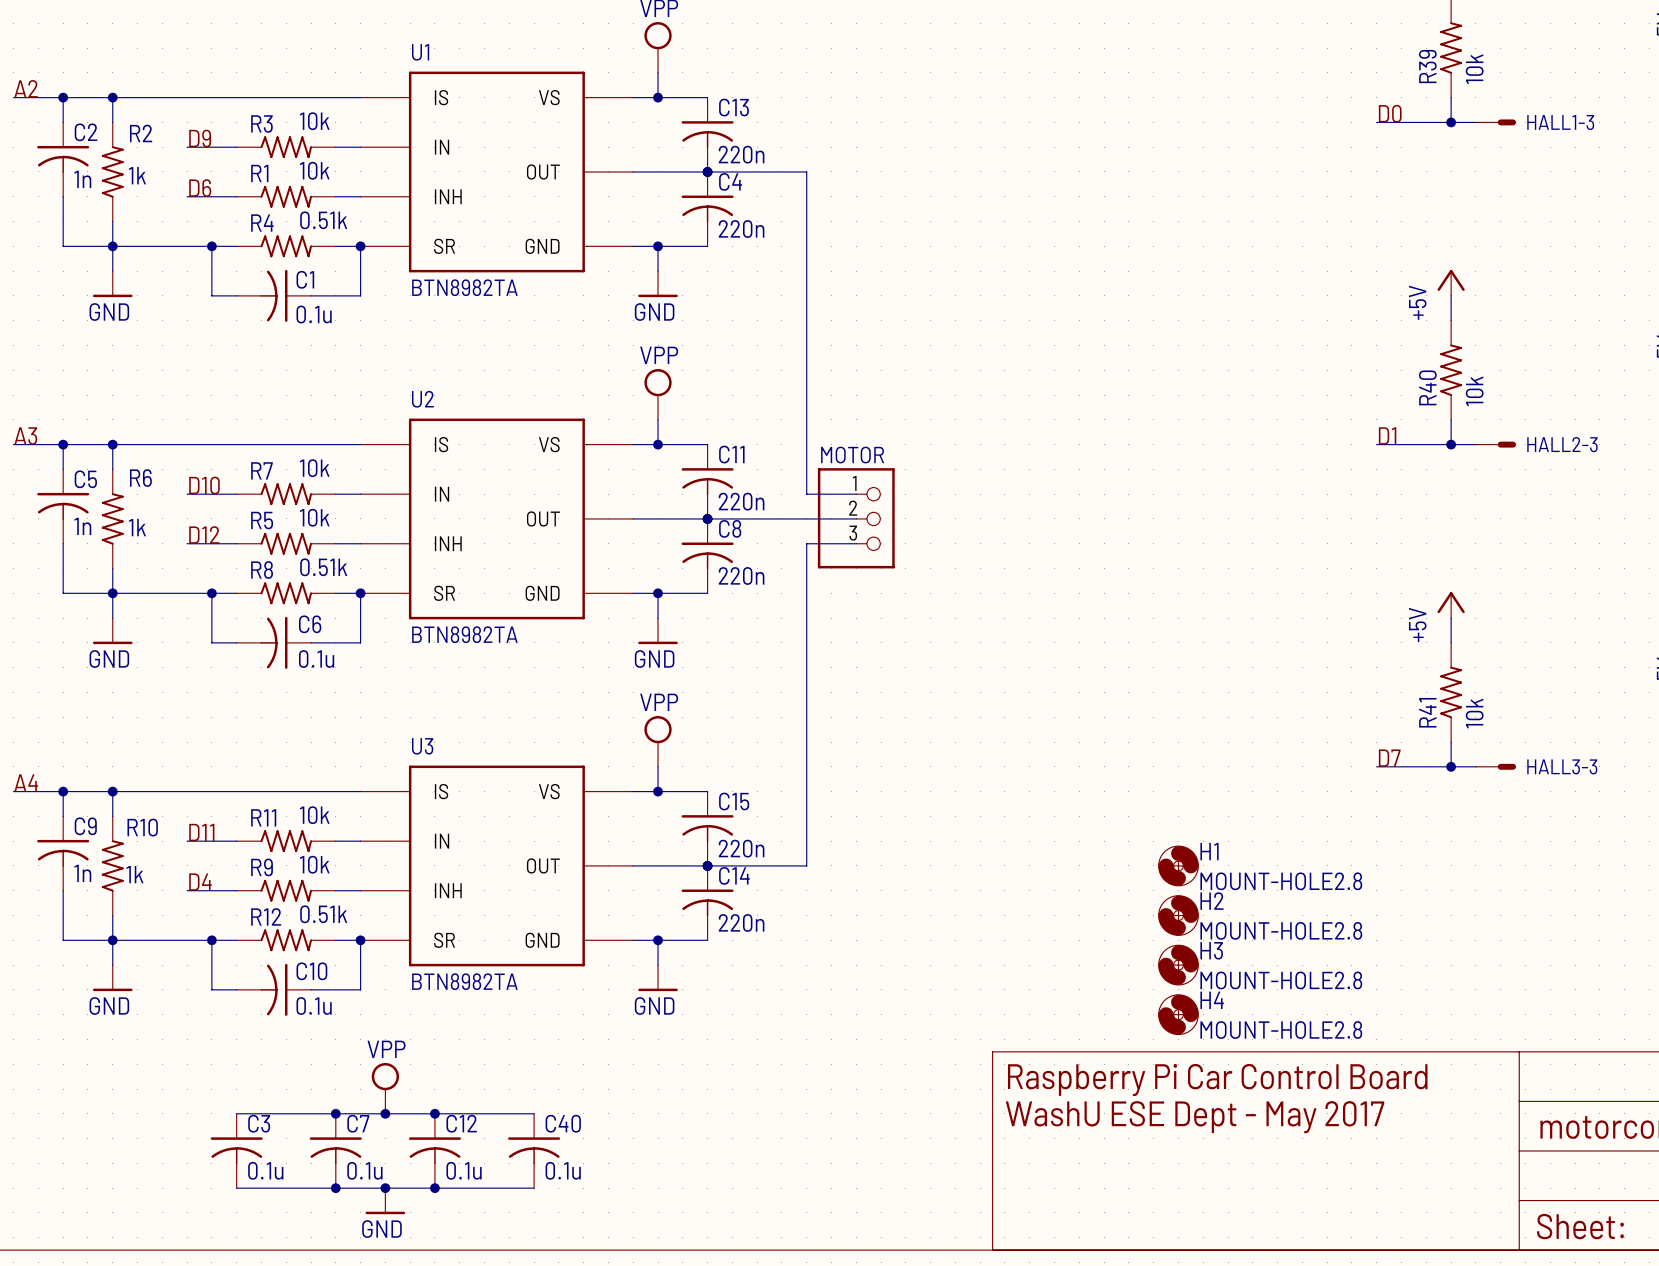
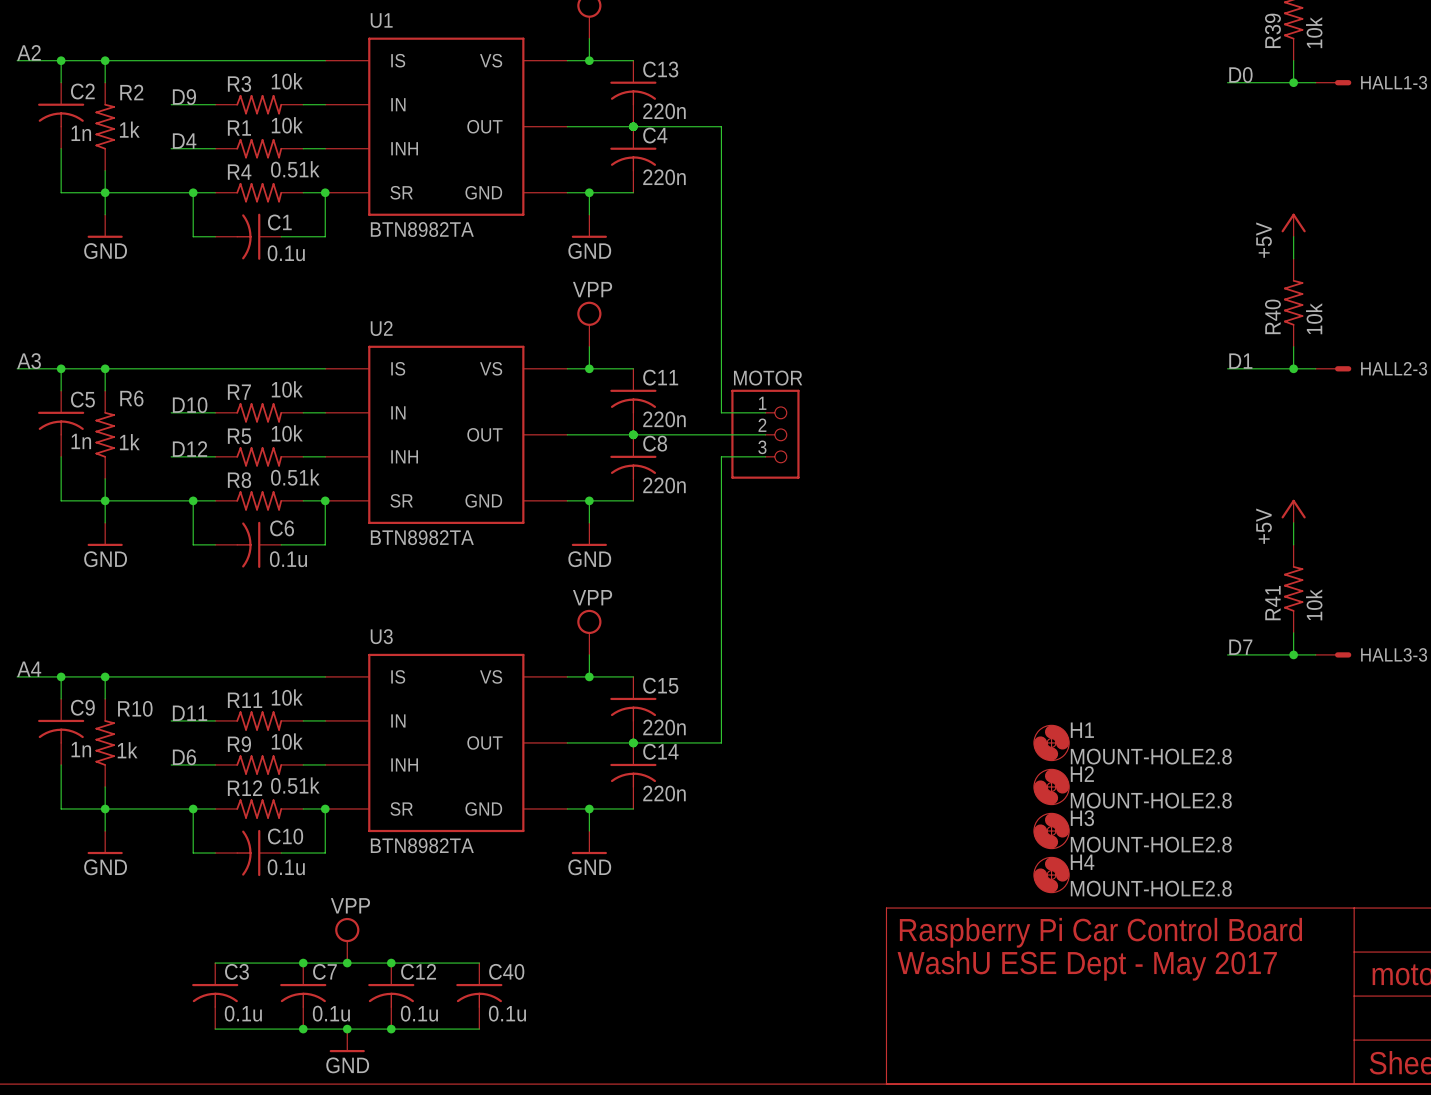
label: D6 (200, 188) -> D4 (184, 141)
label: D4 (200, 882) -> D6 (184, 757)

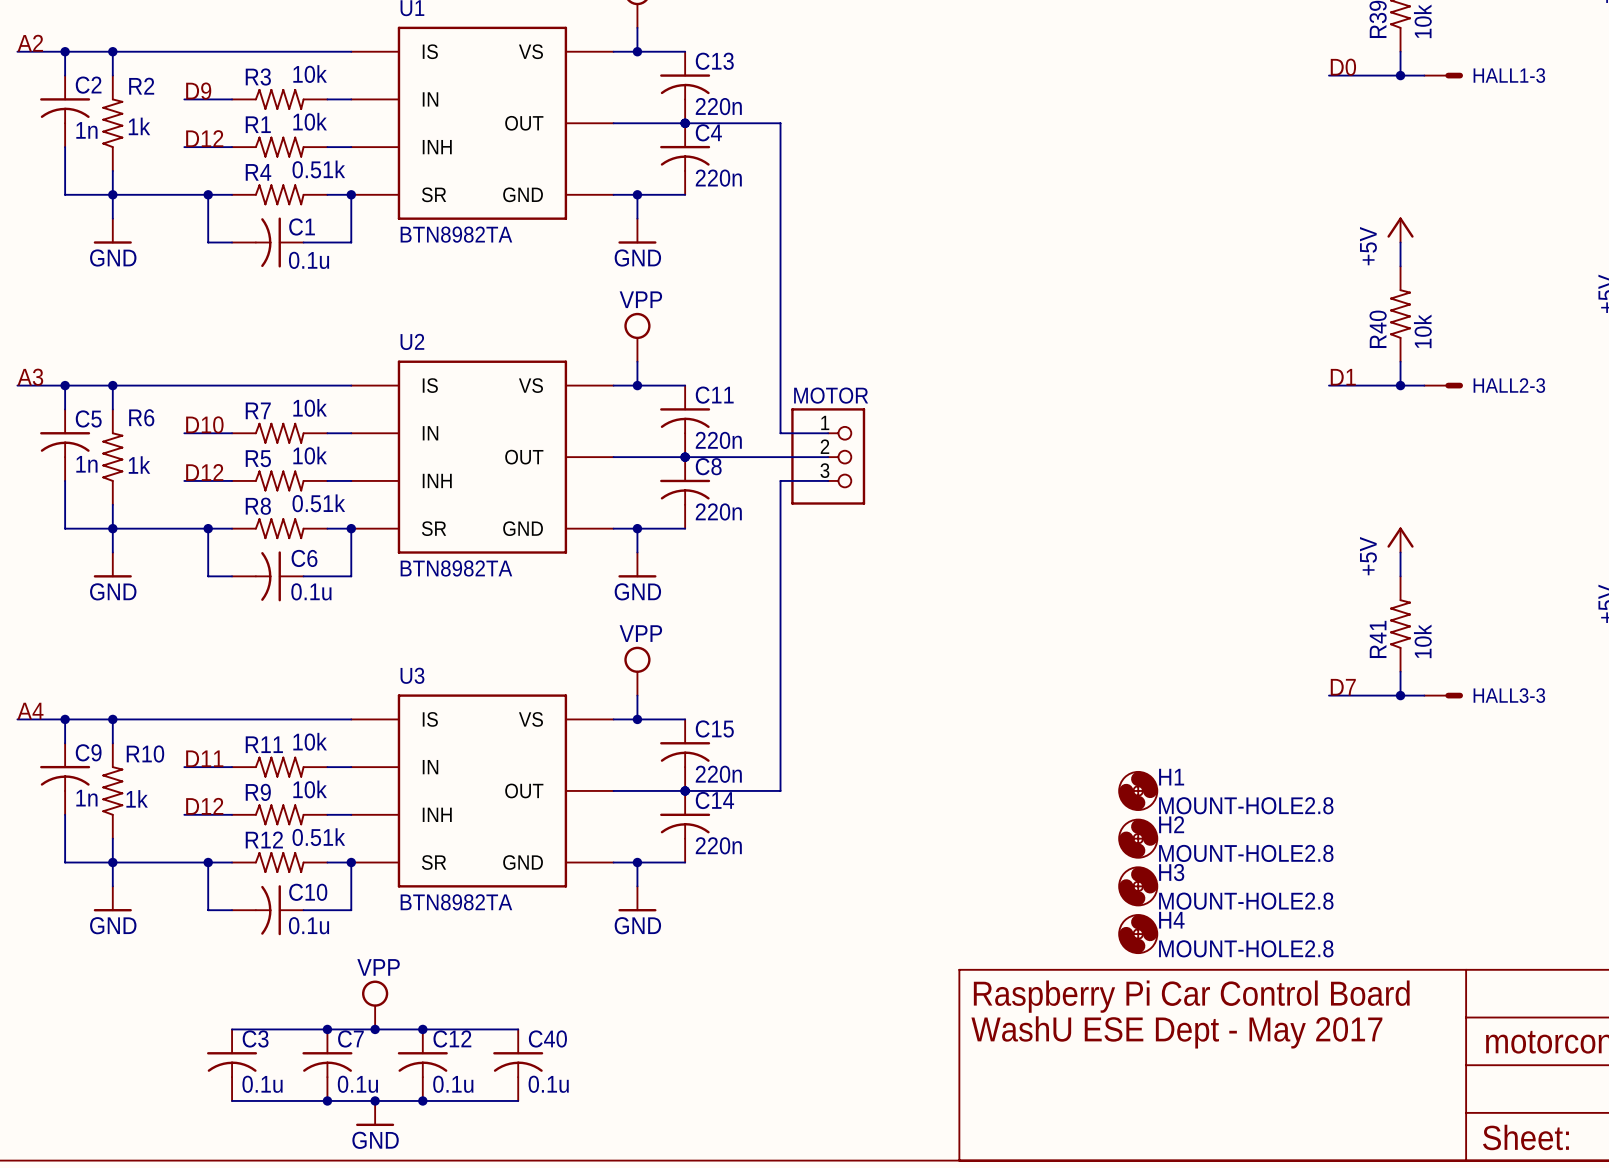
label: D4 (184, 141) -> D12 (204, 138)
label: D6 (184, 757) -> D12 (204, 806)

